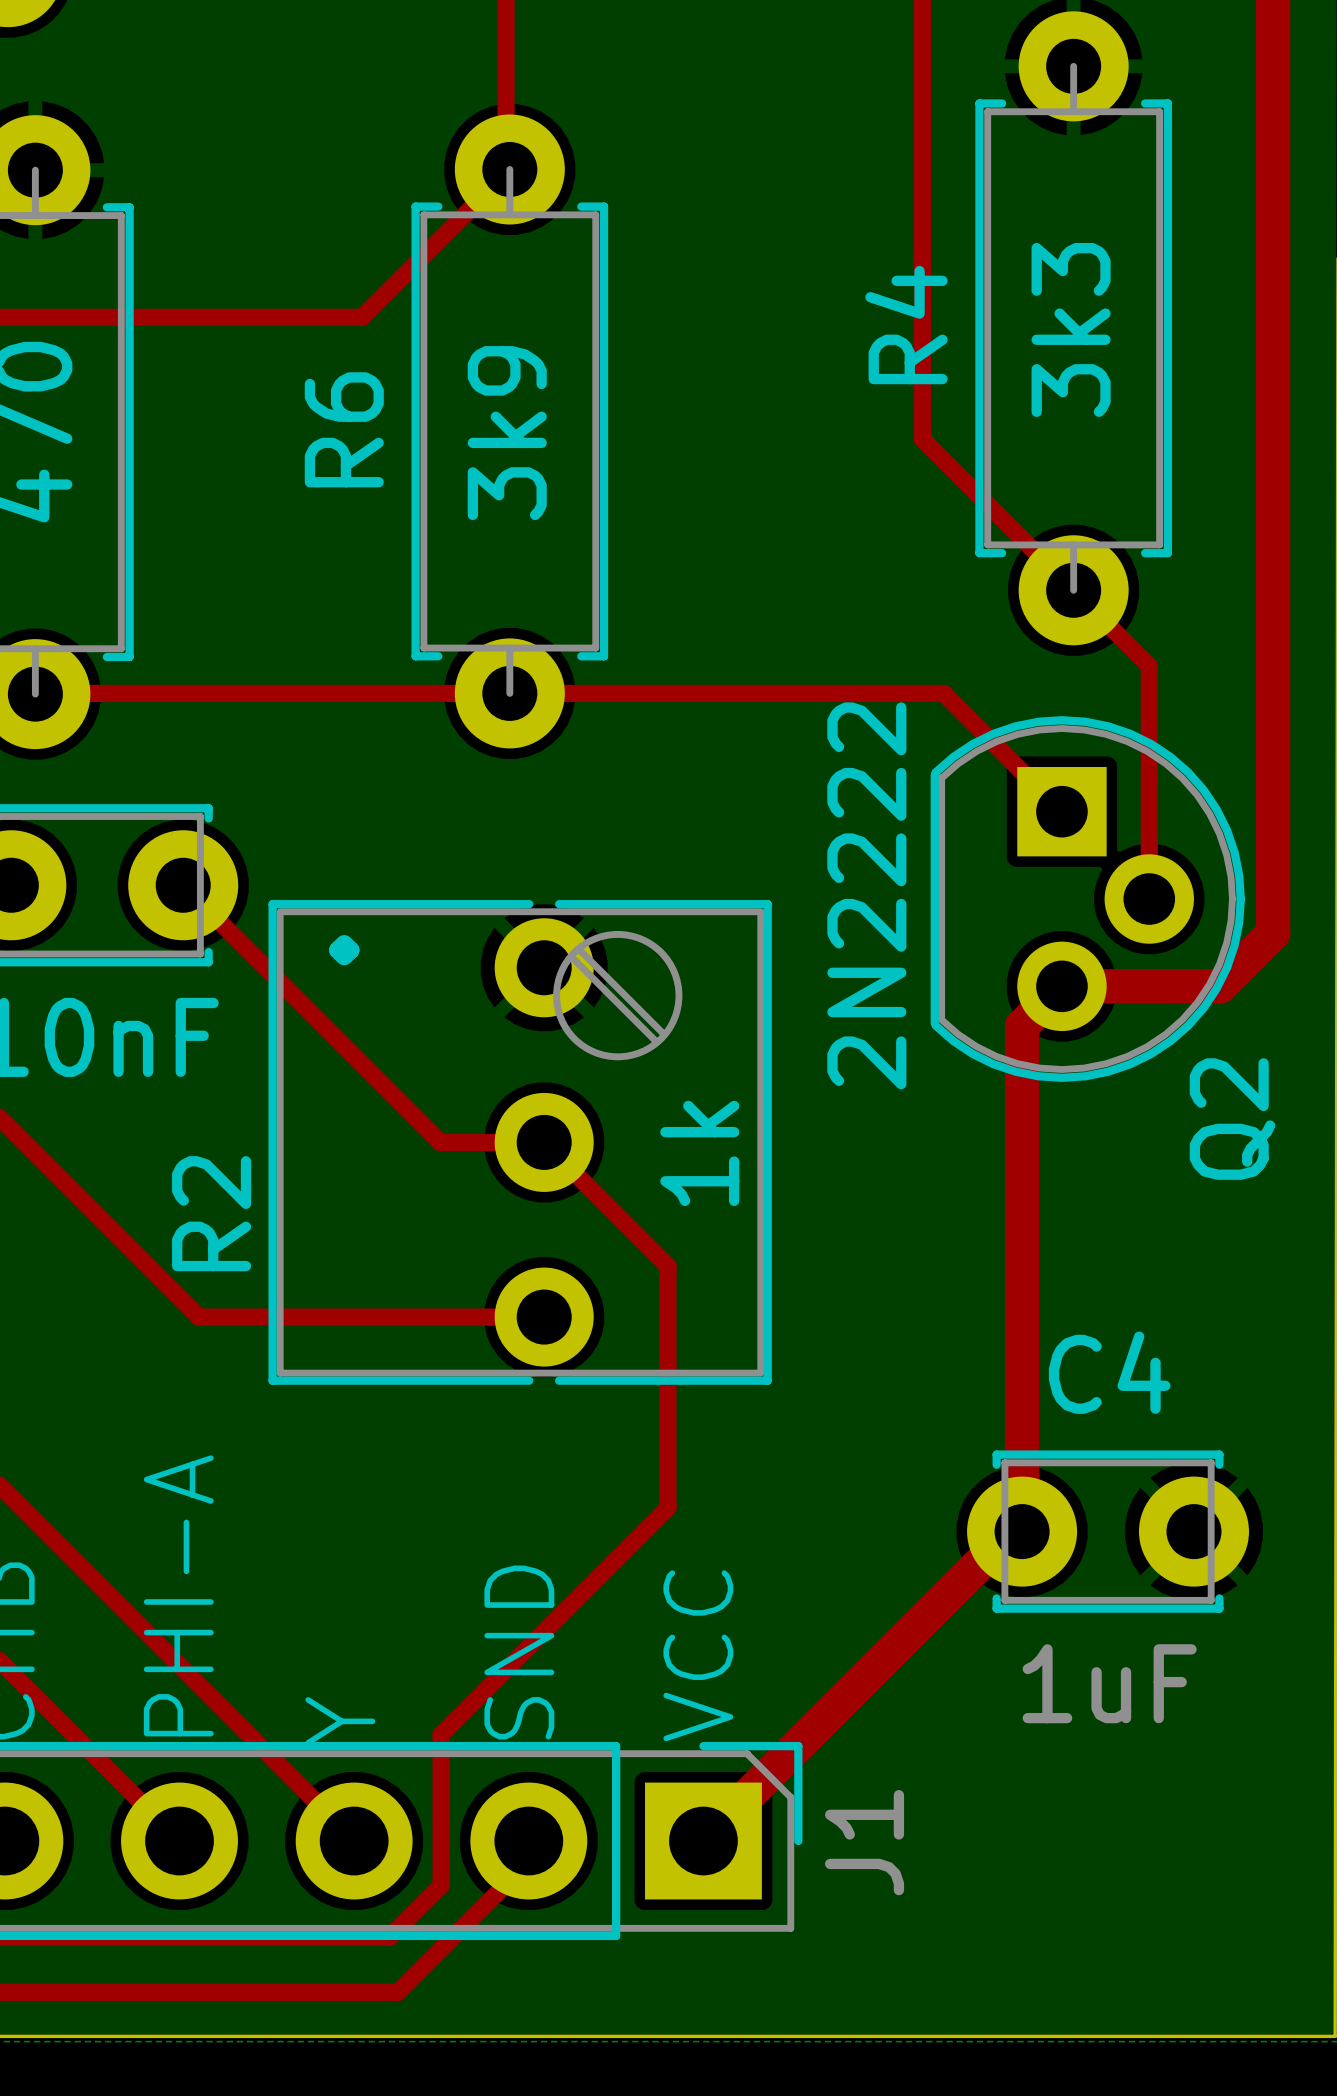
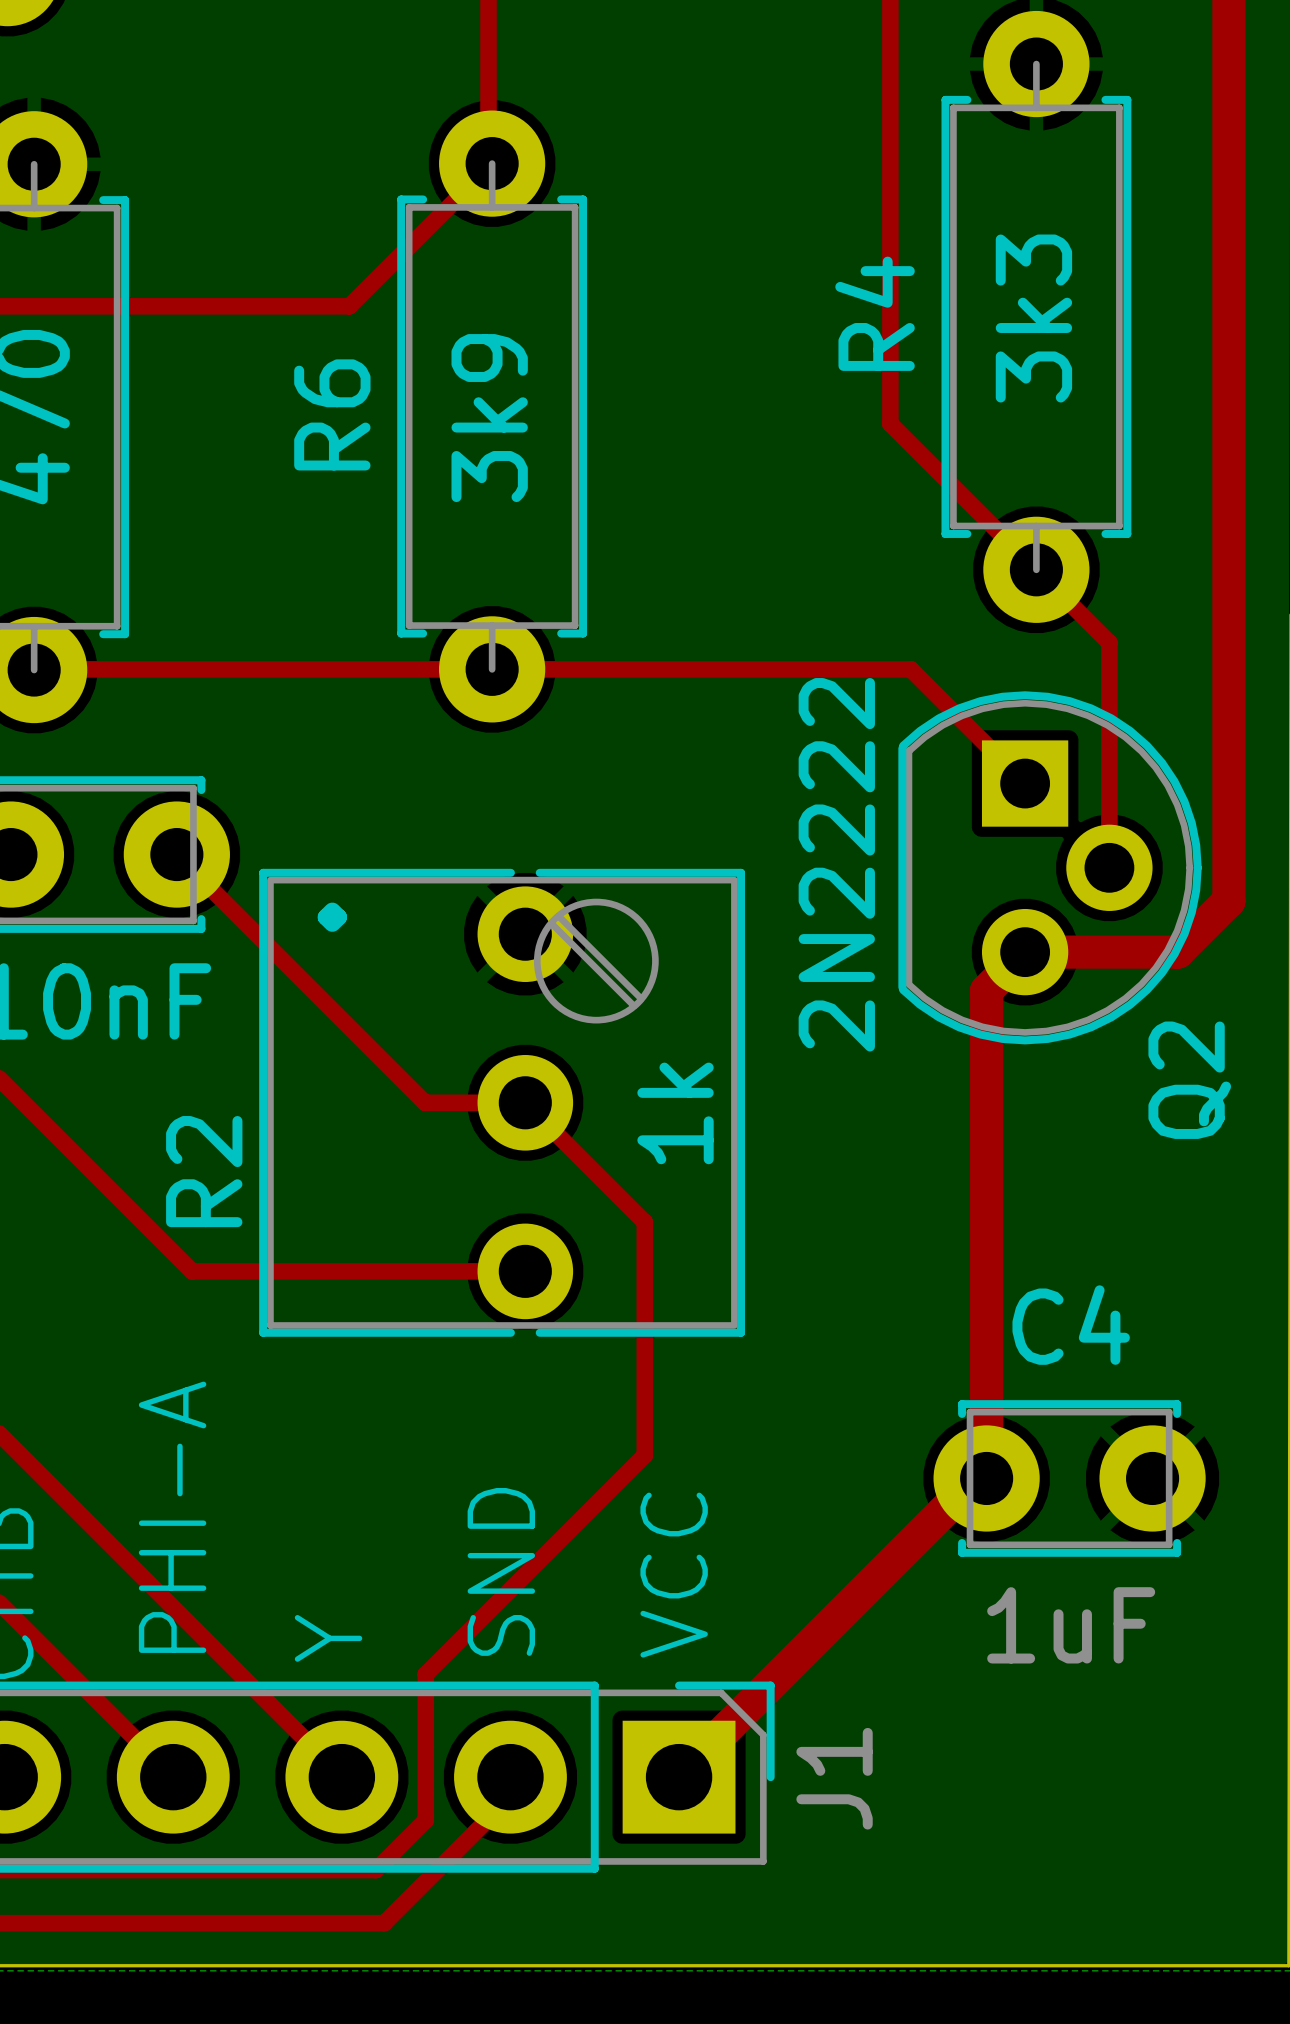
text position: PHI-A (178, 1595) -> PHI-A (172, 1517)
text position: SND (519, 1652) -> SND (501, 1571)
text position: VCC (698, 1655) -> VCC (674, 1575)
text position: Y (340, 1721) -> Y (328, 1638)

